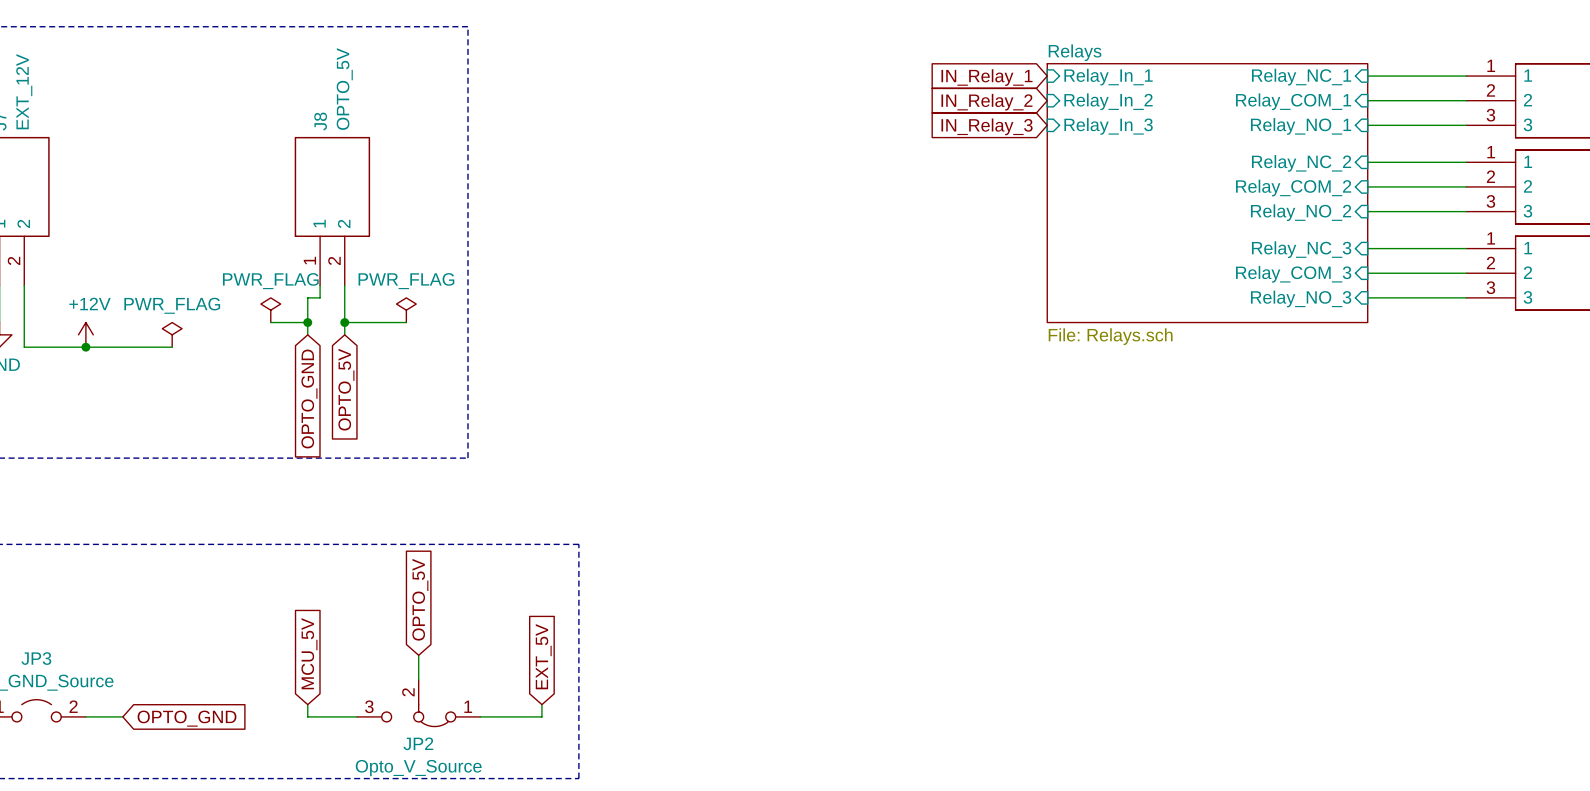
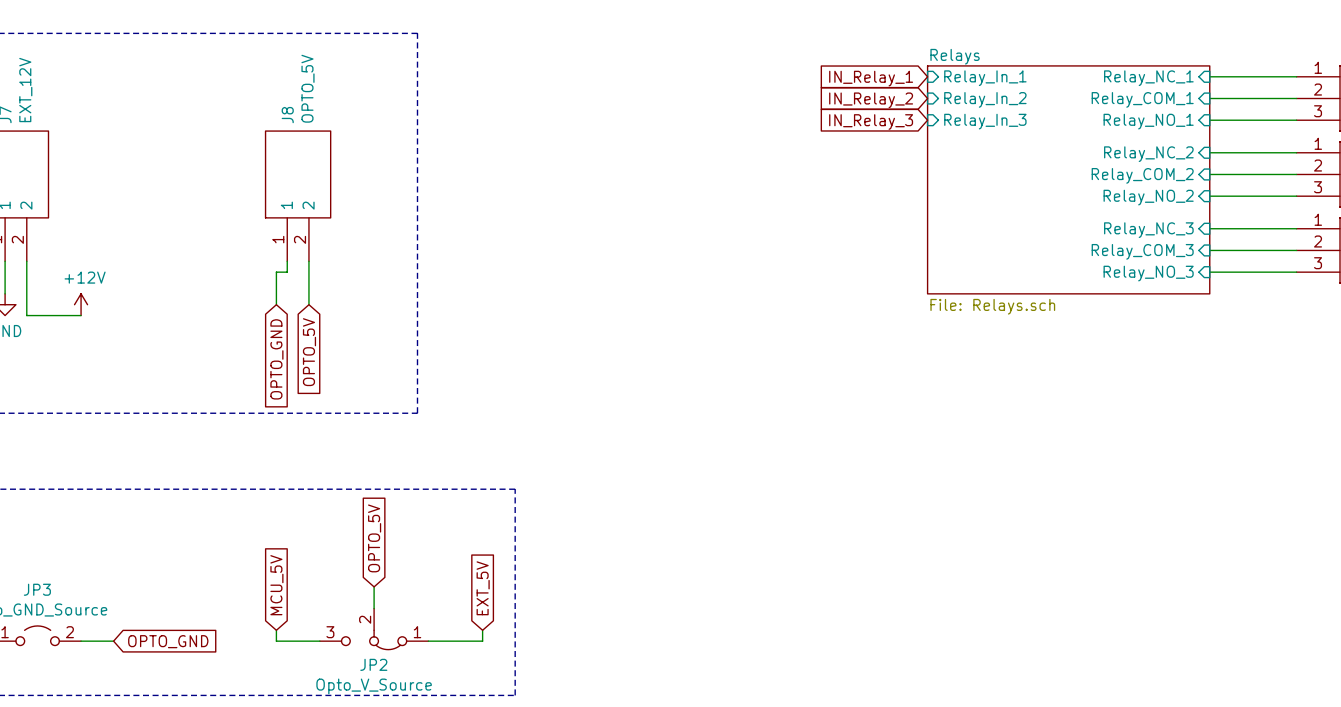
power symbol: PWR_FLAG (270, 310) -> none
power symbol: PWR_FLAG (406, 310) -> none
wire: (270, 322) (307, 322) -> none
junction: (307, 322) -> none
wire: (344, 322) (406, 322) -> none
junction: (344, 322) -> none
power symbol: PWR_FLAG (172, 334) -> none
wire: (85, 347) (172, 347) -> none
junction: (85, 347) -> none

